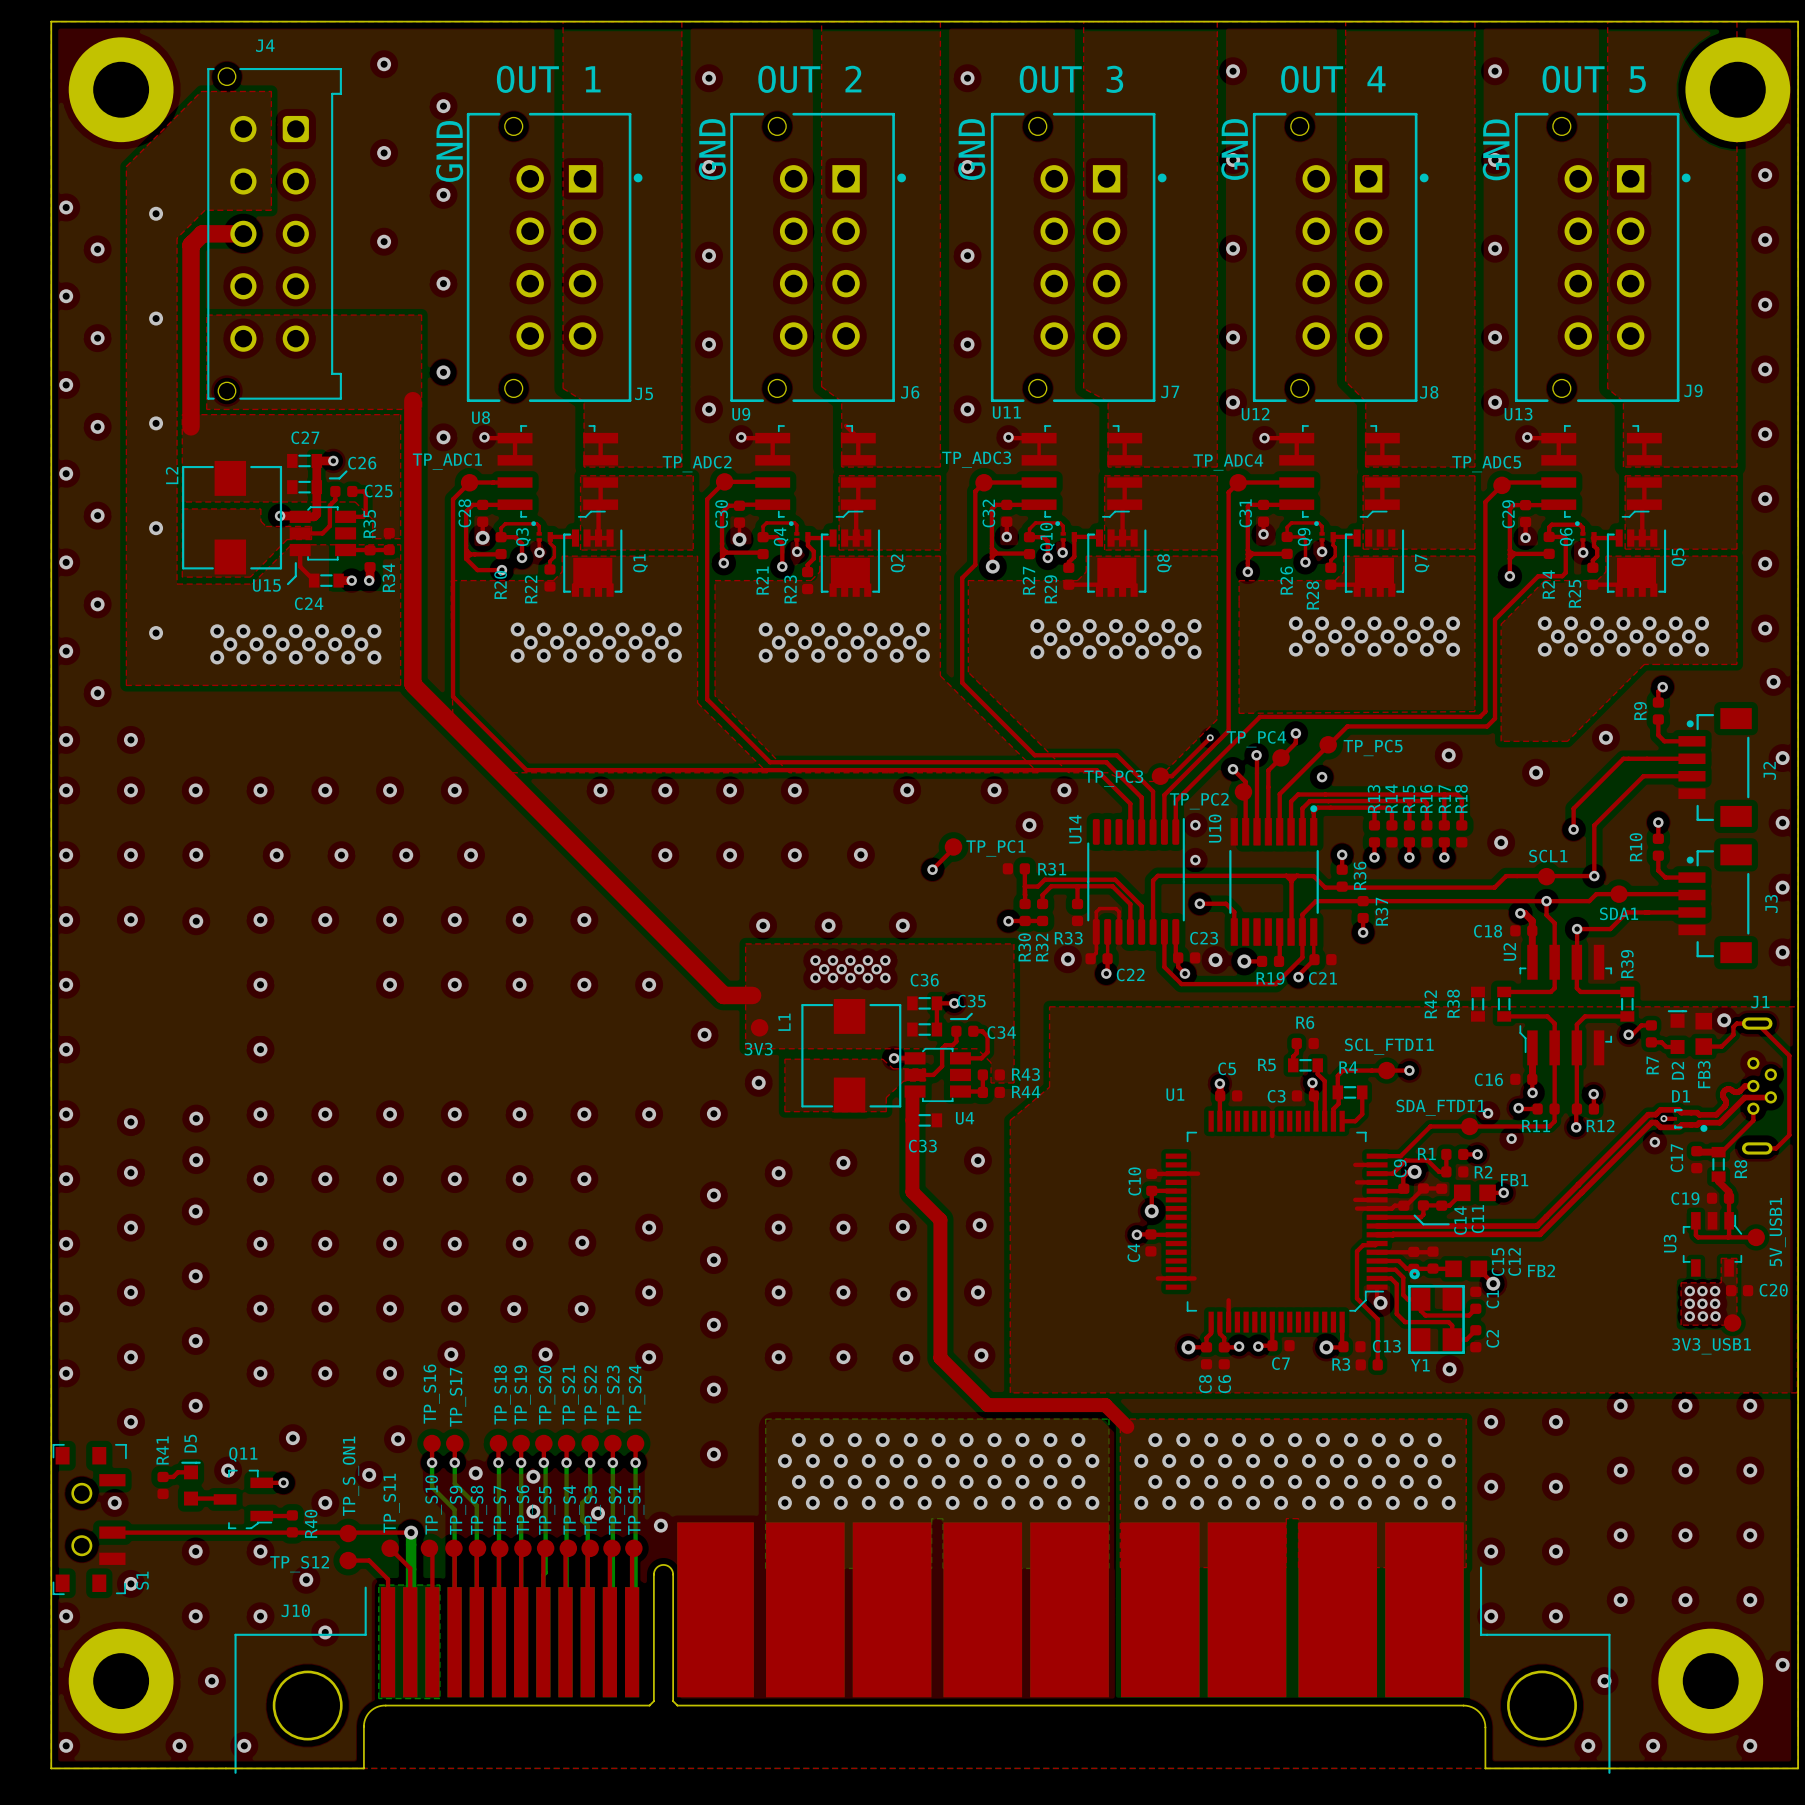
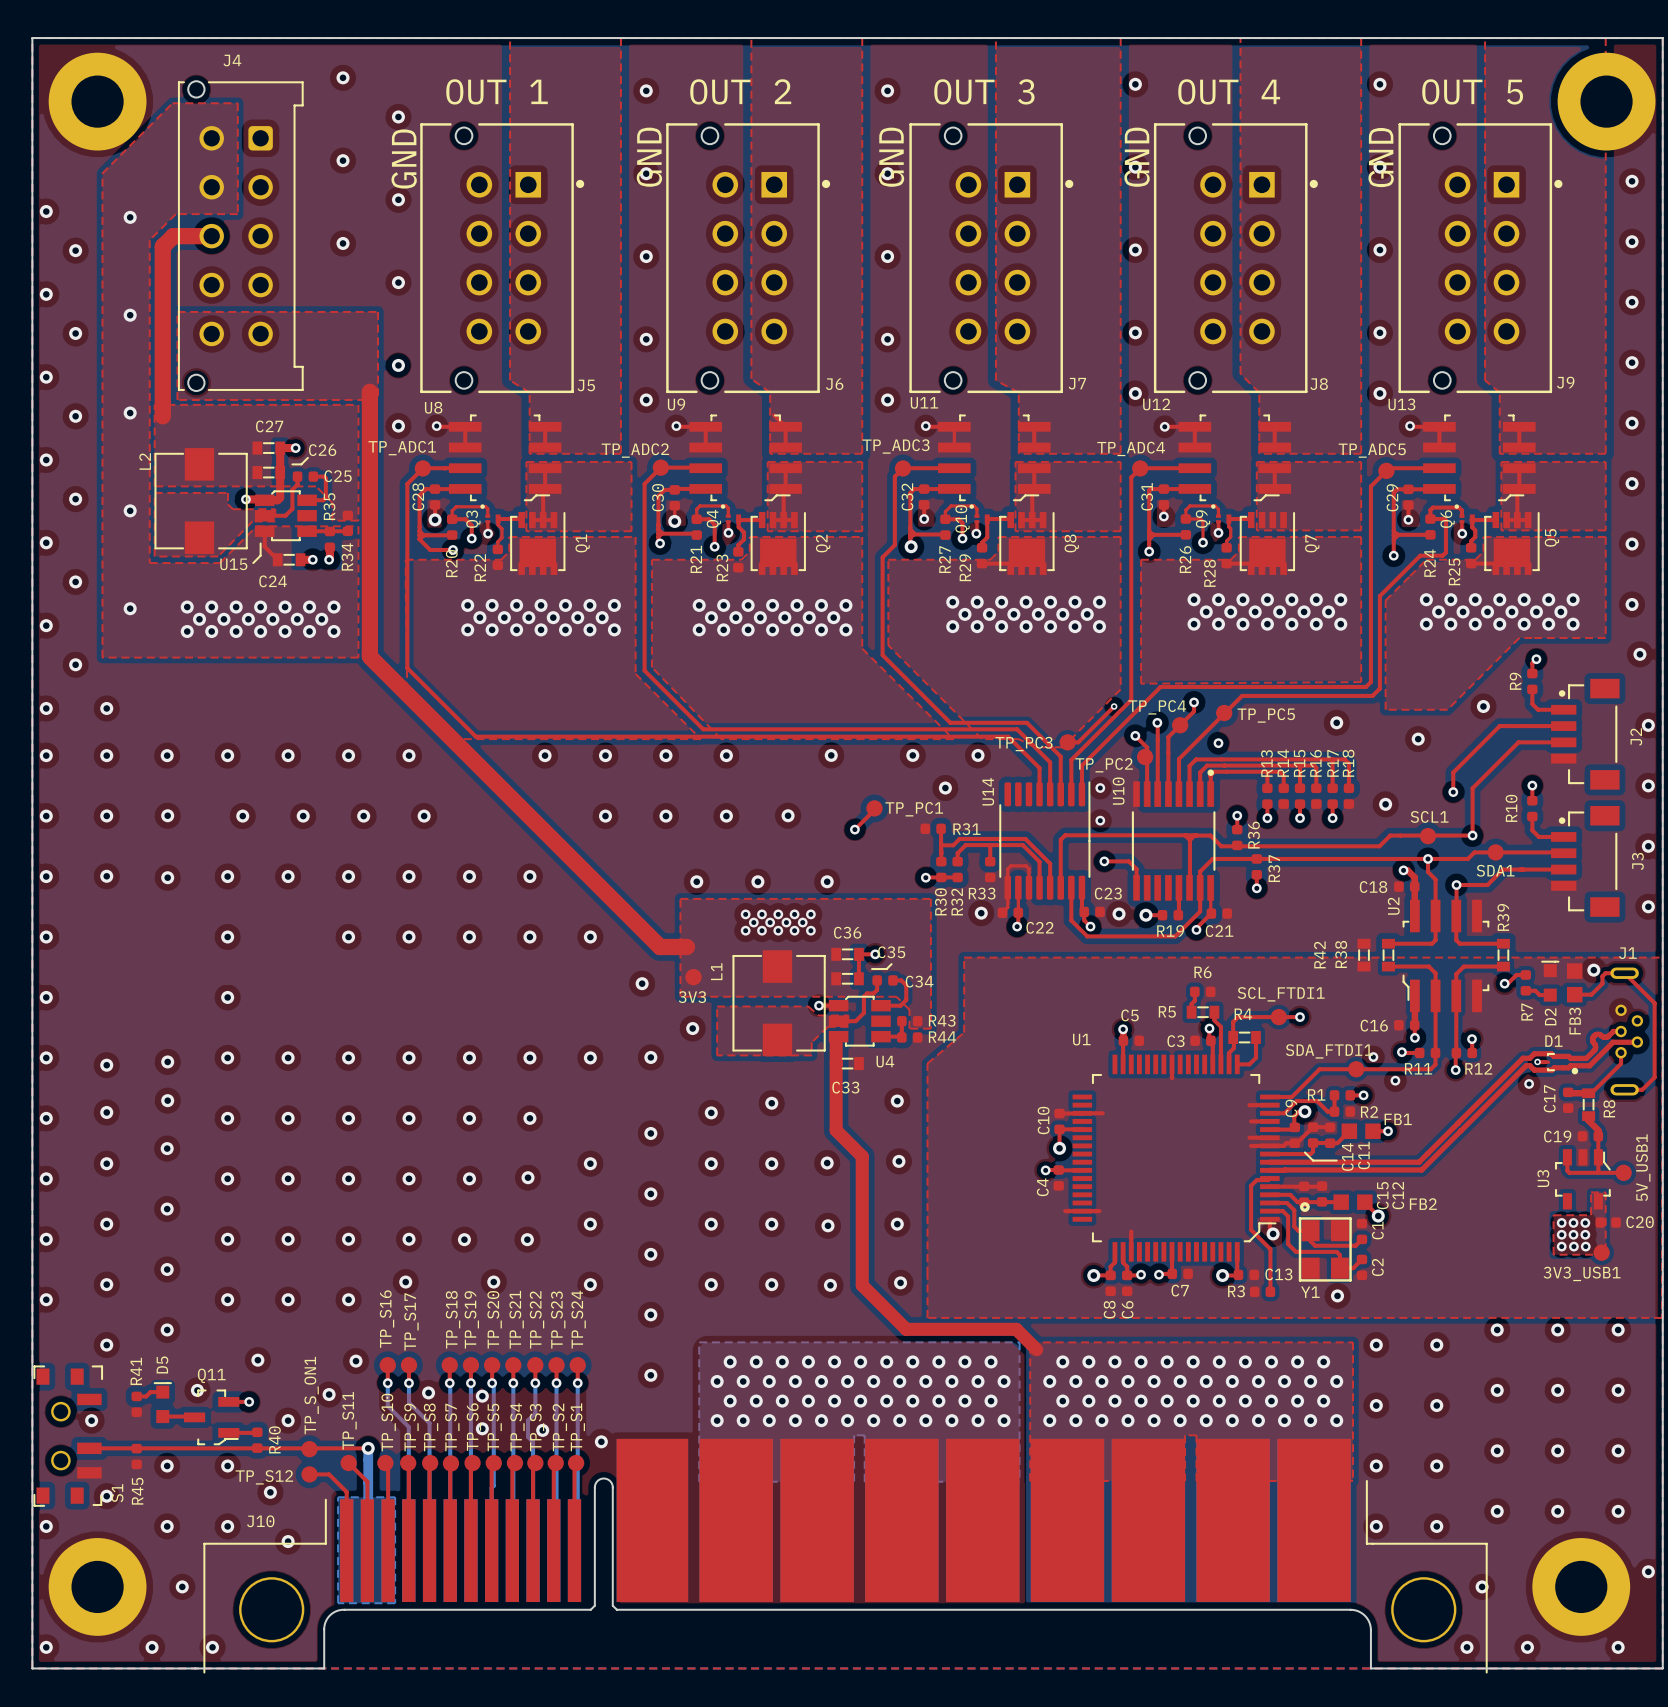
R45: none -> (136, 1456)

